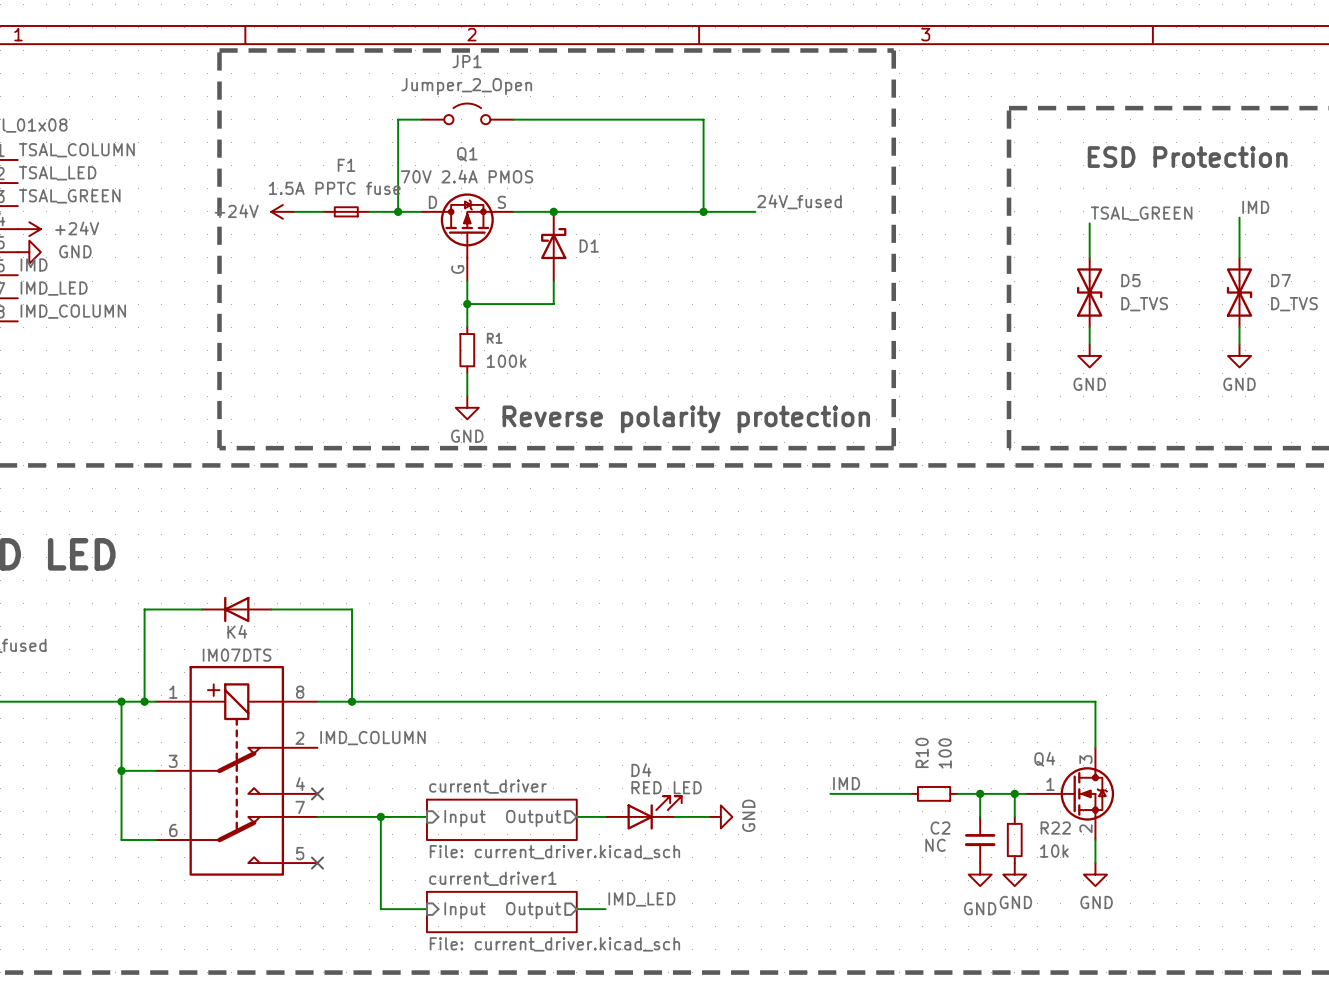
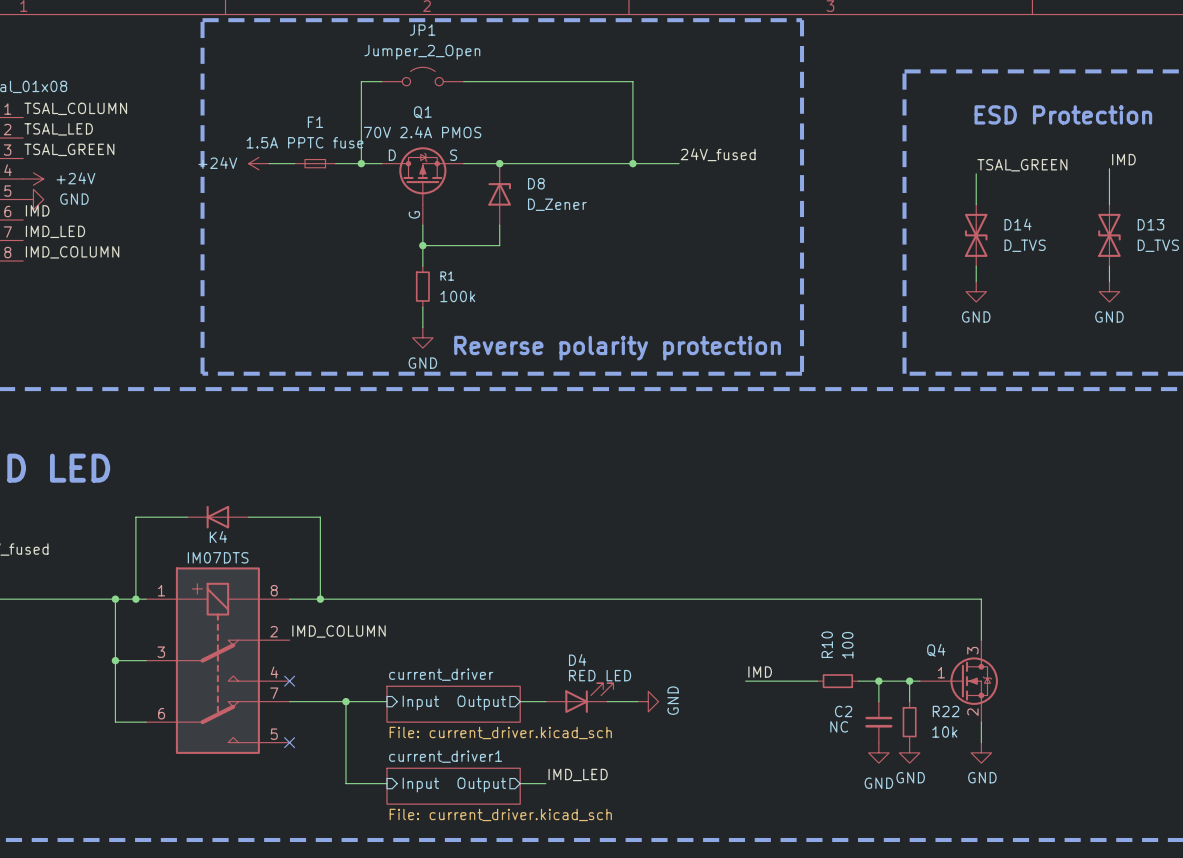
D1: (553, 246) -> none
D8: none -> D_Zener (499, 194)
D5 name: D5 (1130, 280) -> D14 (1018, 224)
D7 name: D7 (1281, 280) -> D13 (1151, 224)

